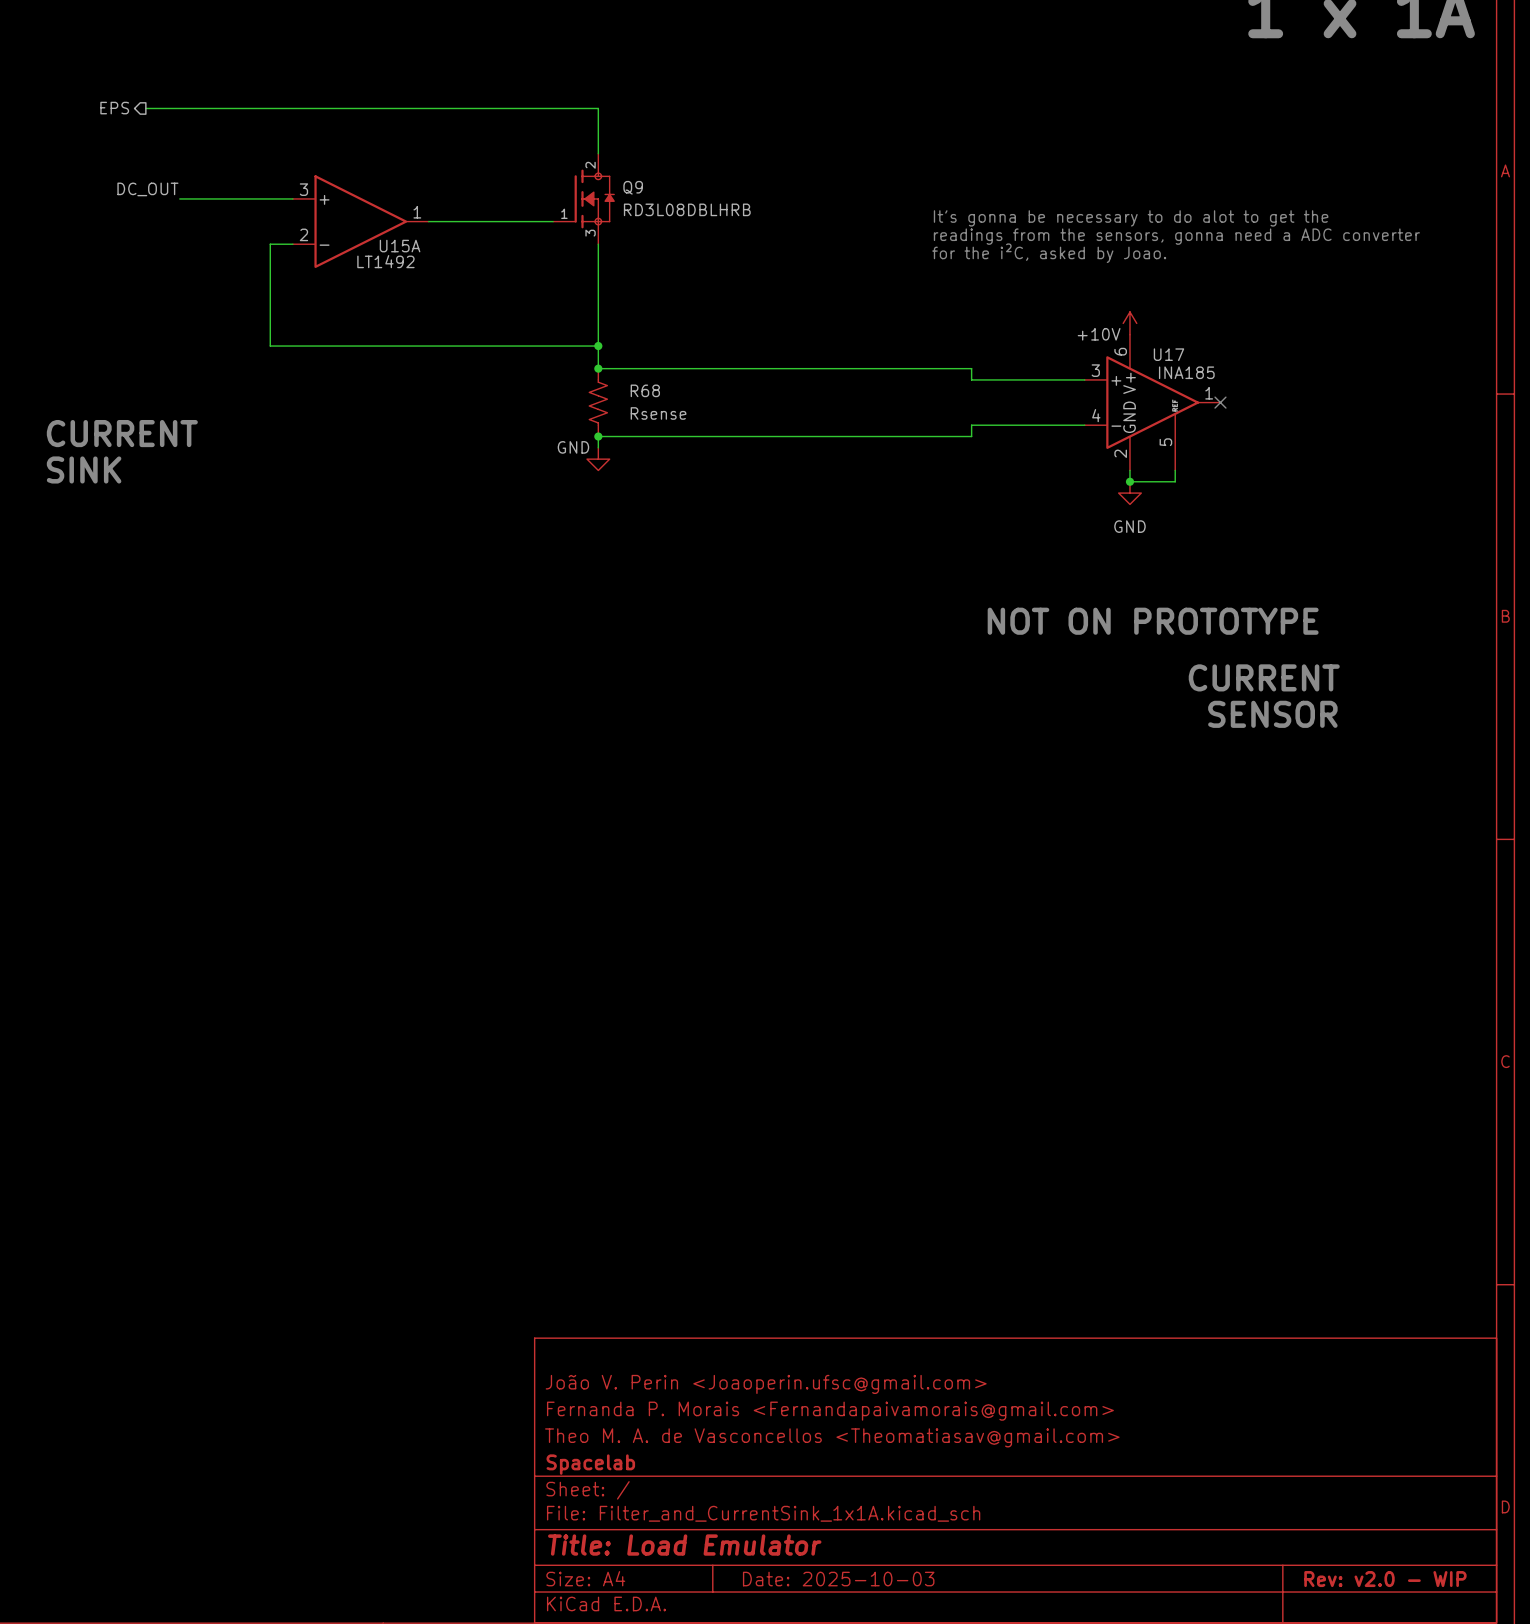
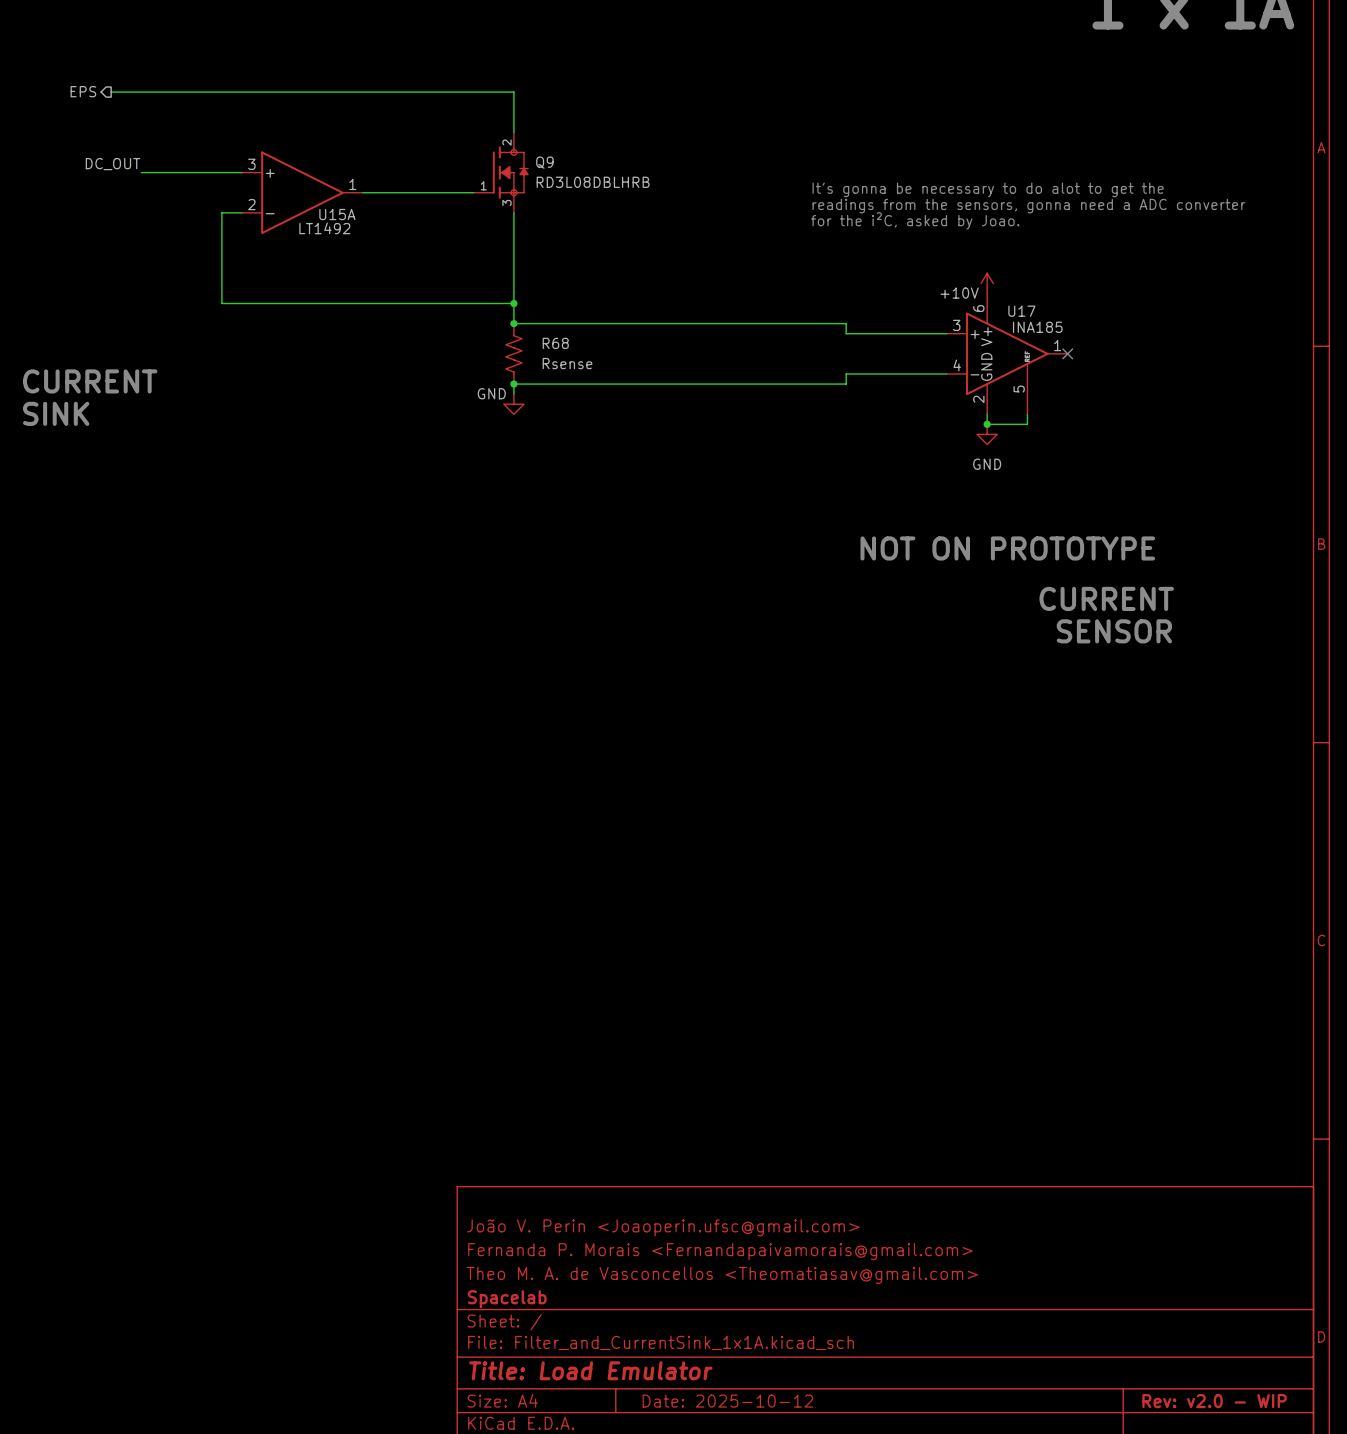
title block: Date: 2025-10-03 (838, 1579) -> Date: 2025-10-12 (727, 1401)

